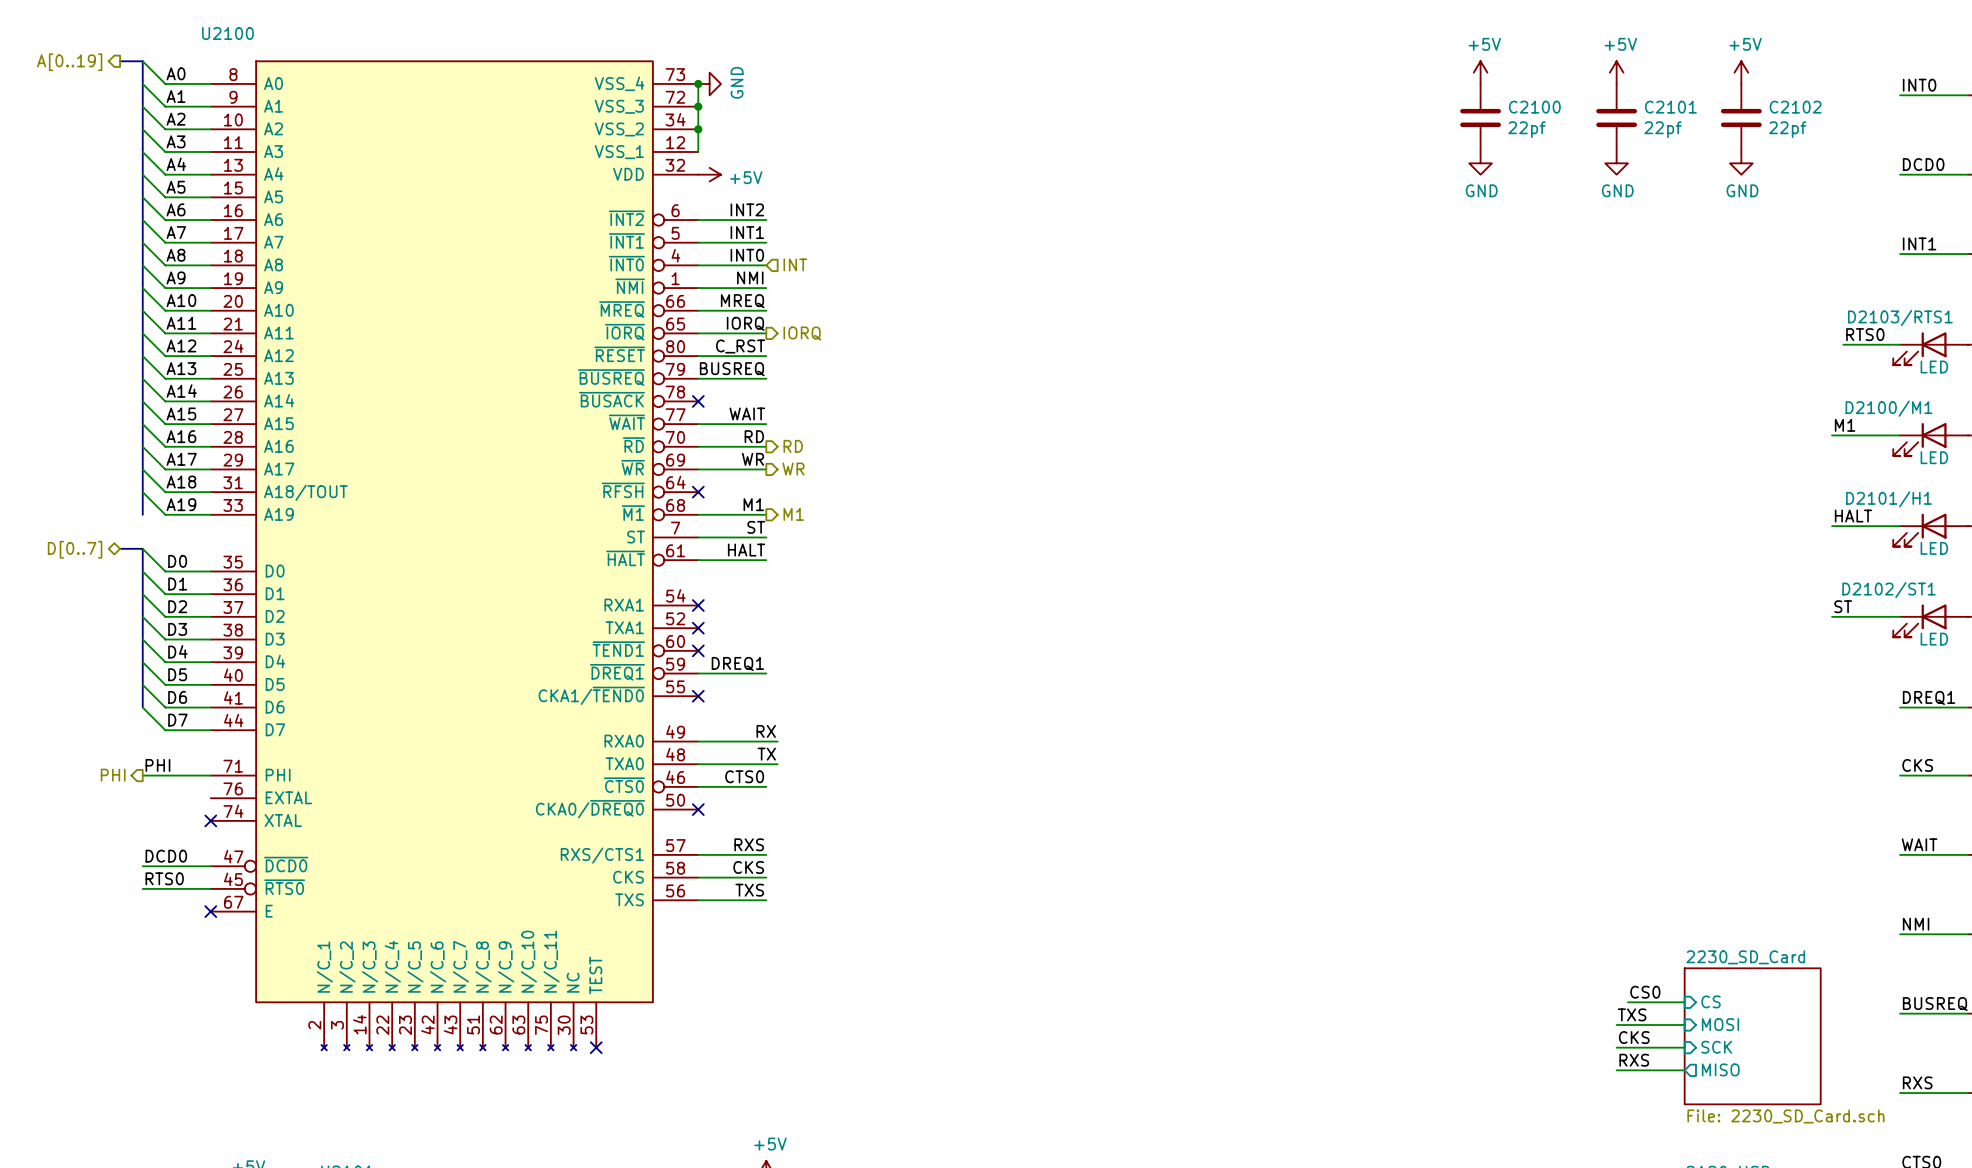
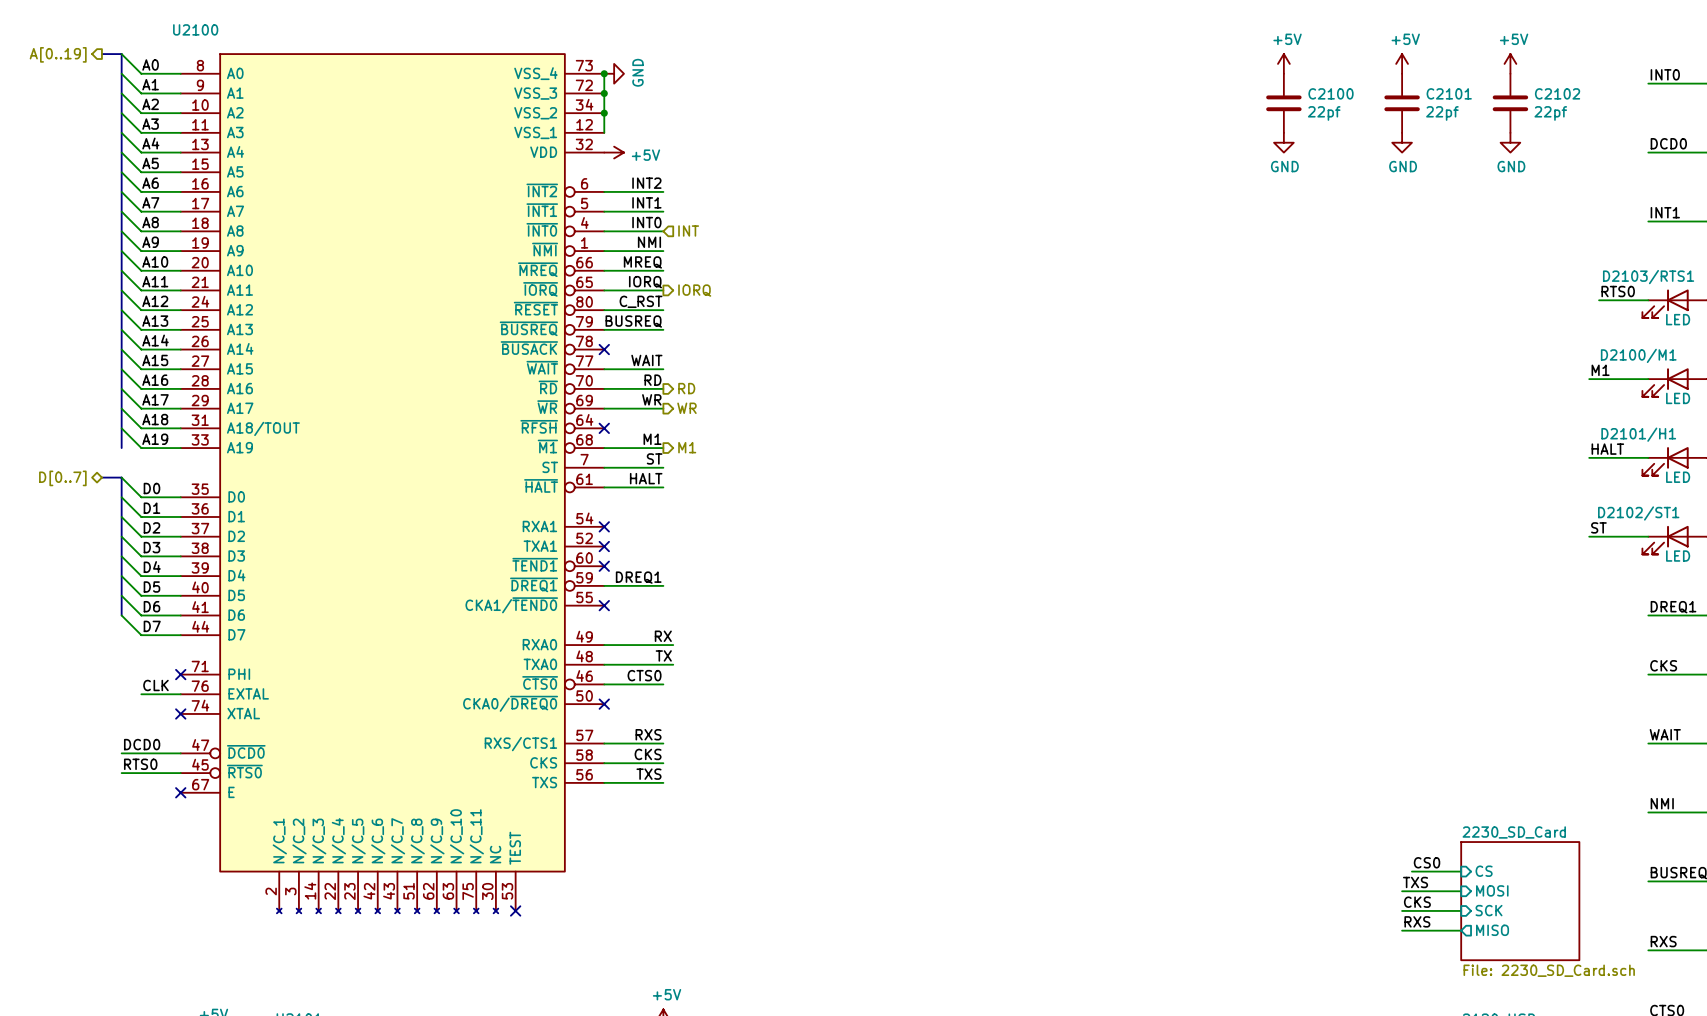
label: PHI (157, 765) -> none
hierarchical label: PHI (113, 775) -> none
wire: (142, 775) (210, 775) -> none
no-connect mark: none -> (180, 674)
label: none -> CLK (155, 685)
wire: none -> (141, 694) (180, 694)

